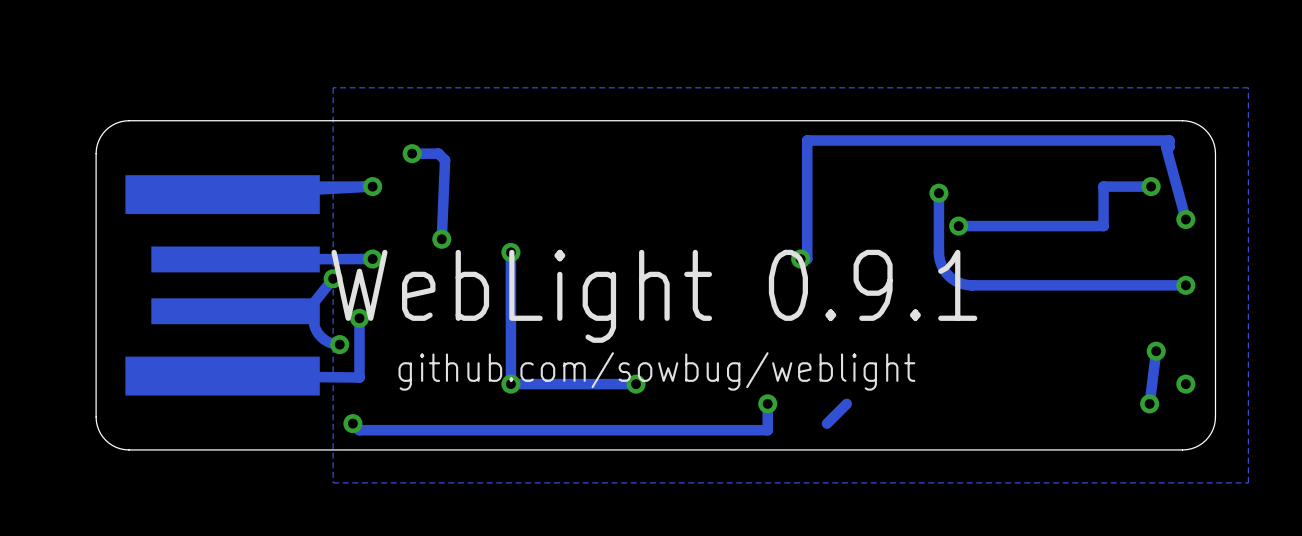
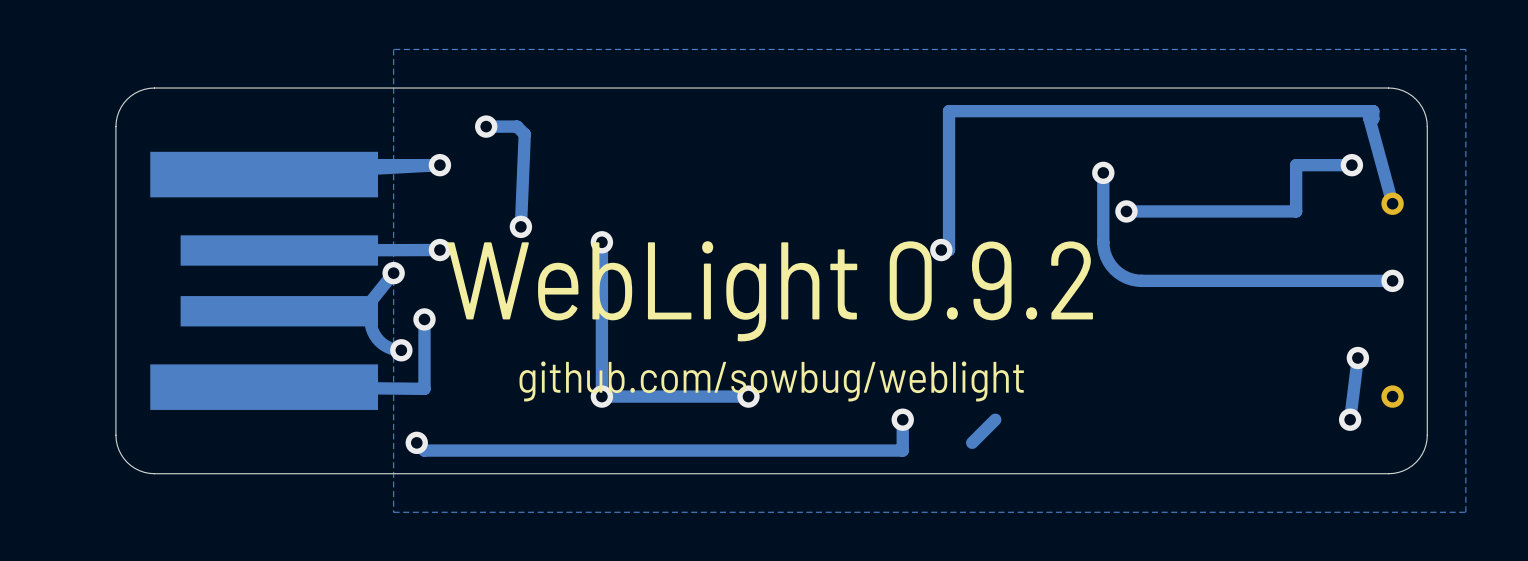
text: WebLight 0.9.1 (654, 296) -> WebLight 0.9.2 (770, 291)

